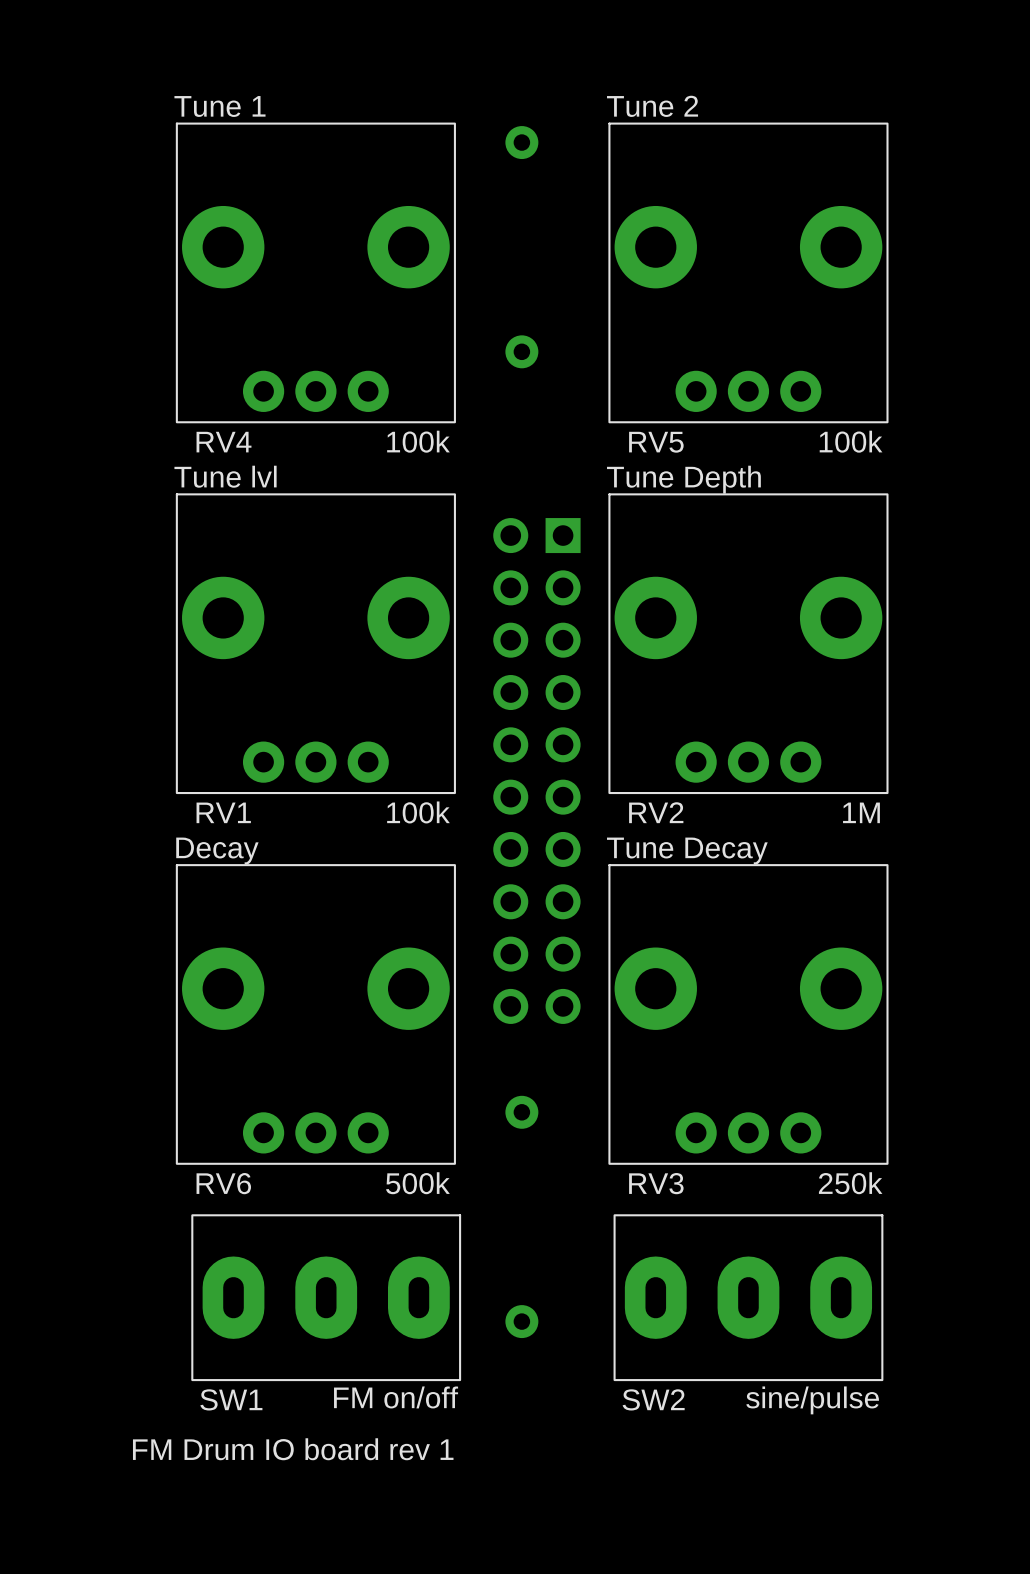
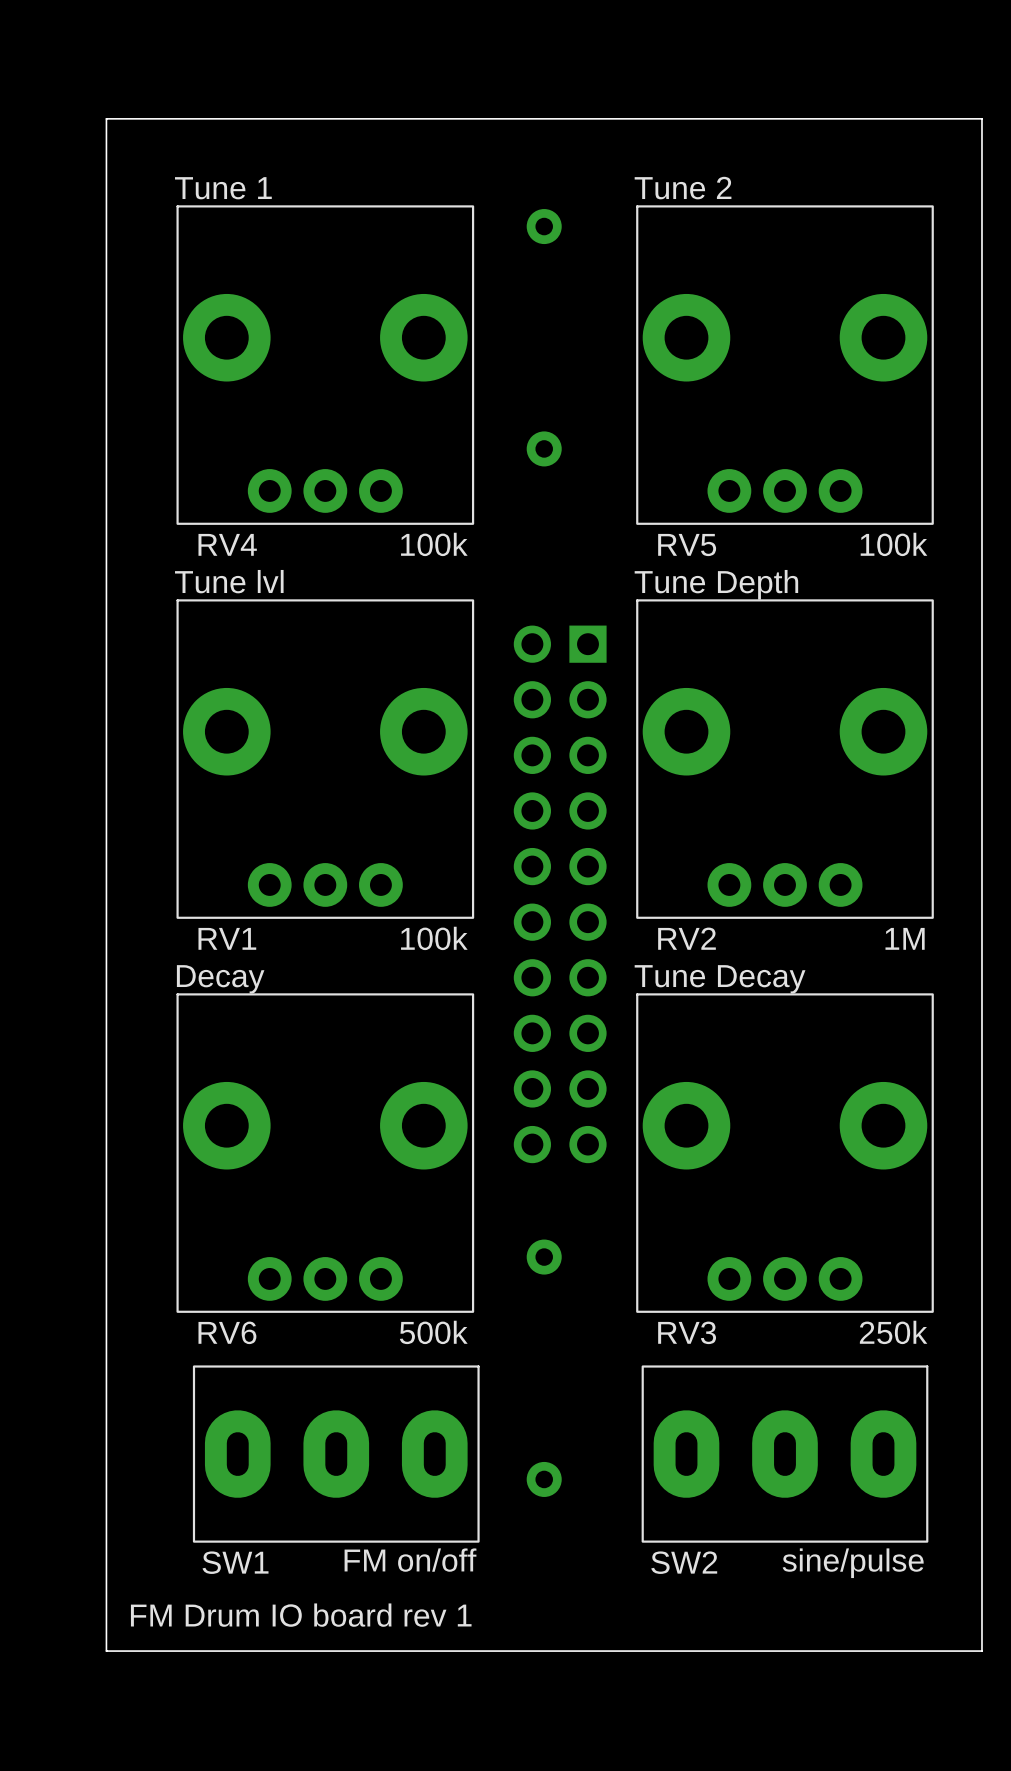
board edge: none -> (106, 118) (981, 118) (981, 1651) (106, 1651) (106, 118)

